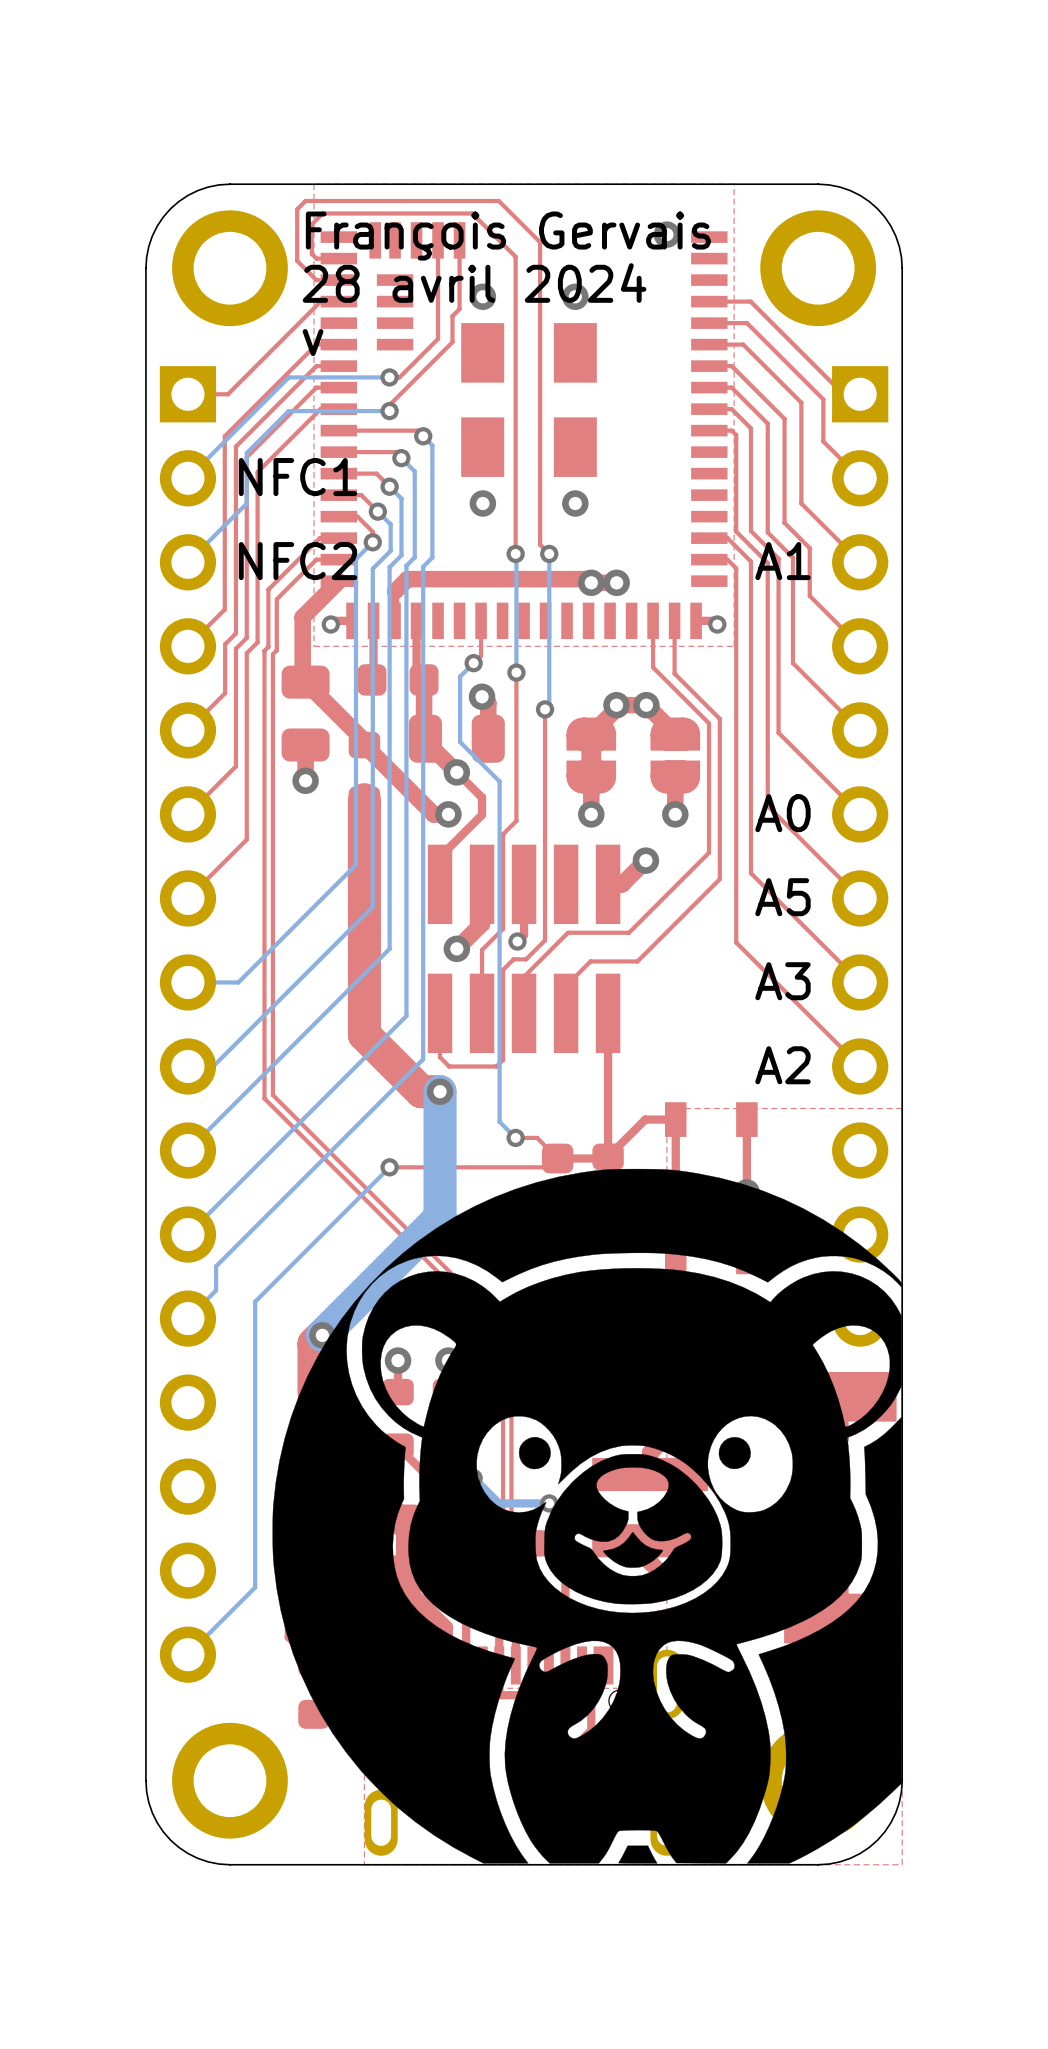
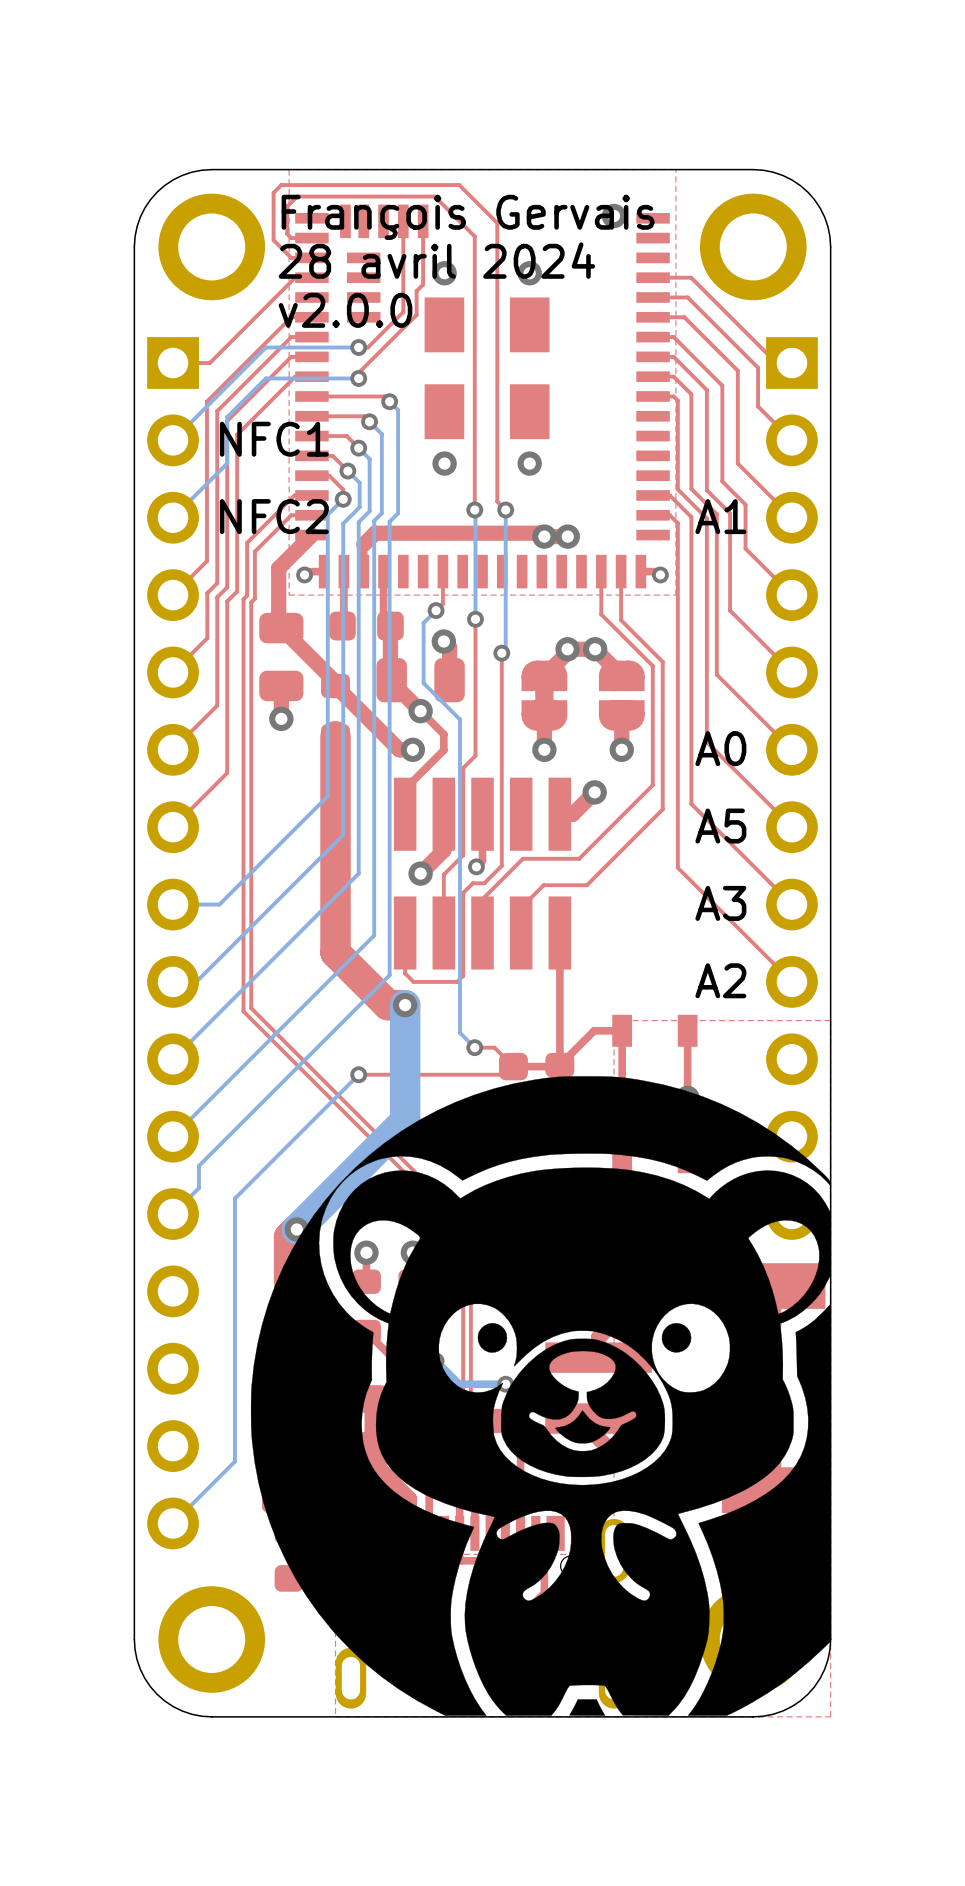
text: v (313, 342) -> v2.0.0 (345, 310)

